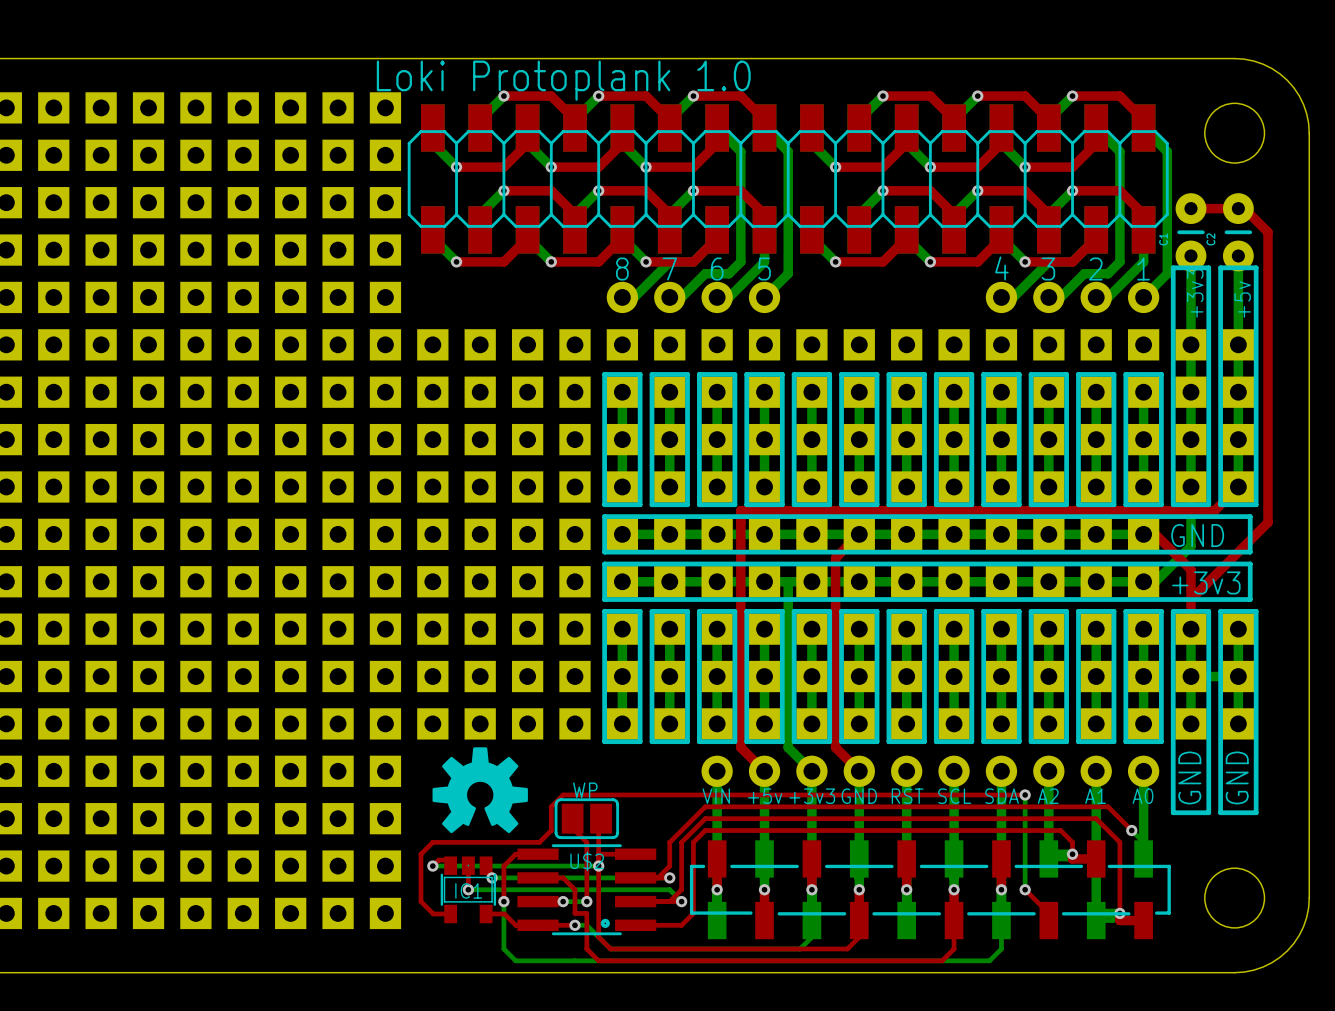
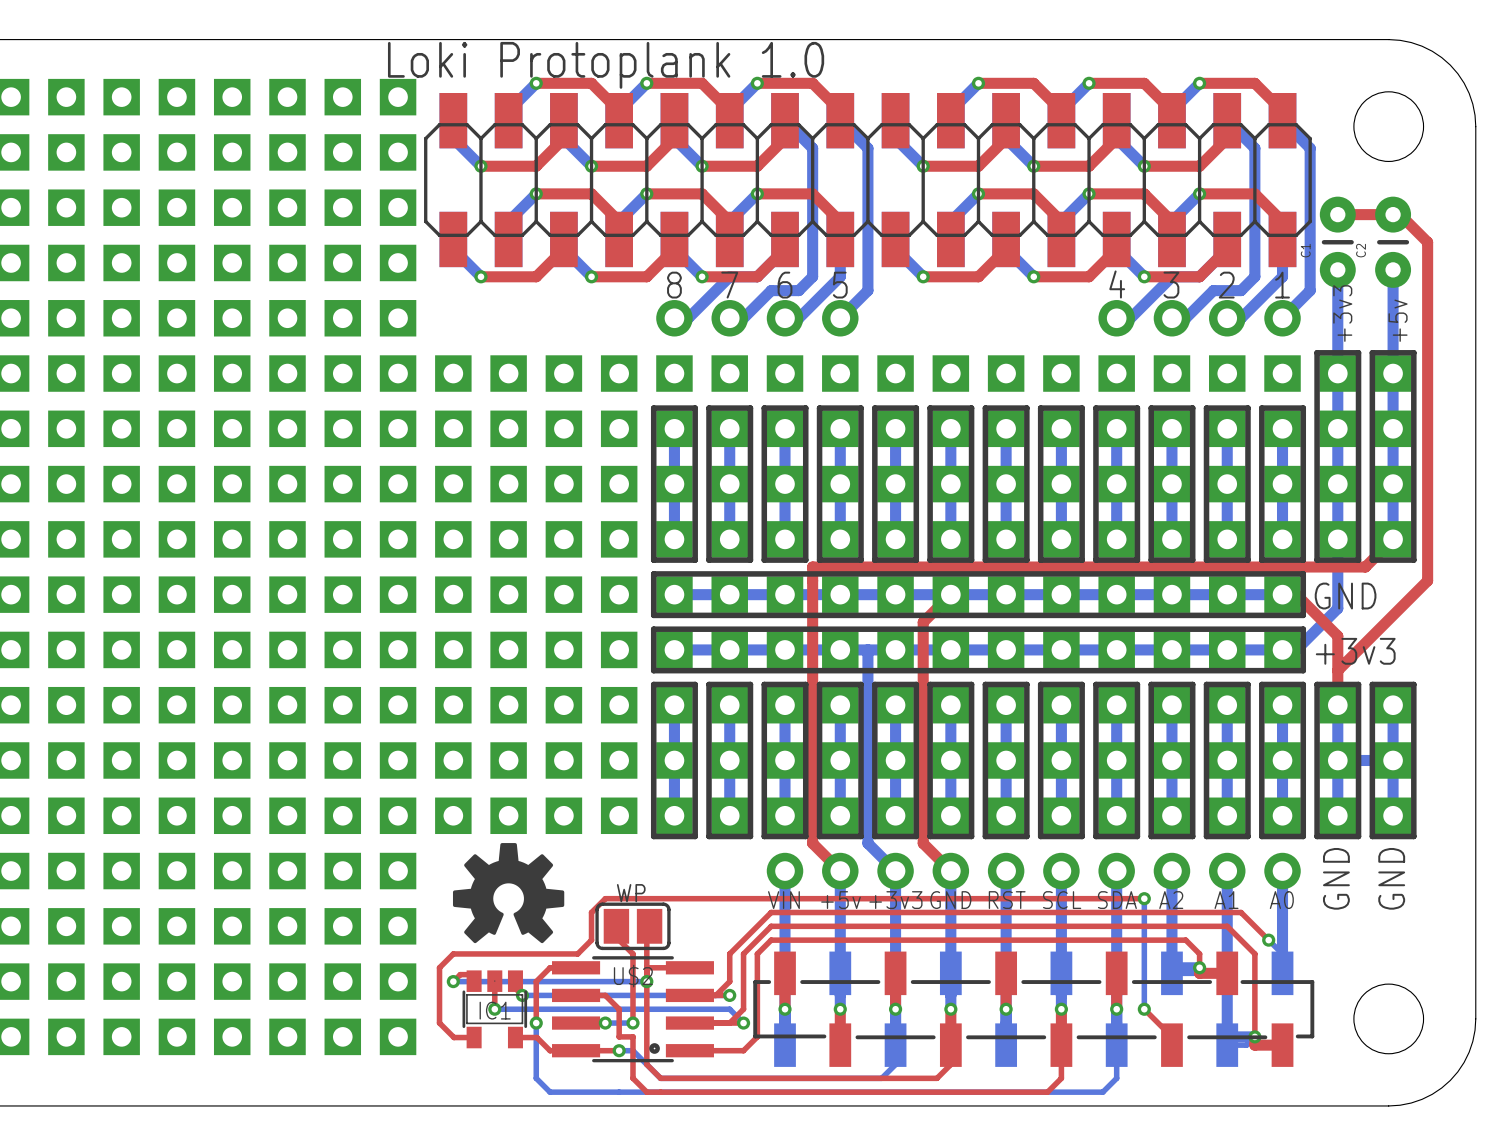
line: (1173, 327) (1173, 267) (1208, 267) (1208, 327) -> (1317, 352) (1358, 352)
line: (1220, 327) (1220, 267) (1256, 267) (1256, 327) -> (1372, 352) (1413, 352)
line: (1161, 516) (1250, 516) (1250, 552) (1161, 552) -> (1303, 573) (1303, 615)
line: (1161, 563) (1250, 563) (1250, 599) (1161, 599) -> (1303, 629) (1303, 670)
line: (1173, 741) (1173, 812) (1208, 812) (1208, 741) -> (1317, 836) (1358, 836)
line: (1220, 741) (1220, 812) (1256, 812) (1256, 741) -> (1372, 836) (1413, 836)

